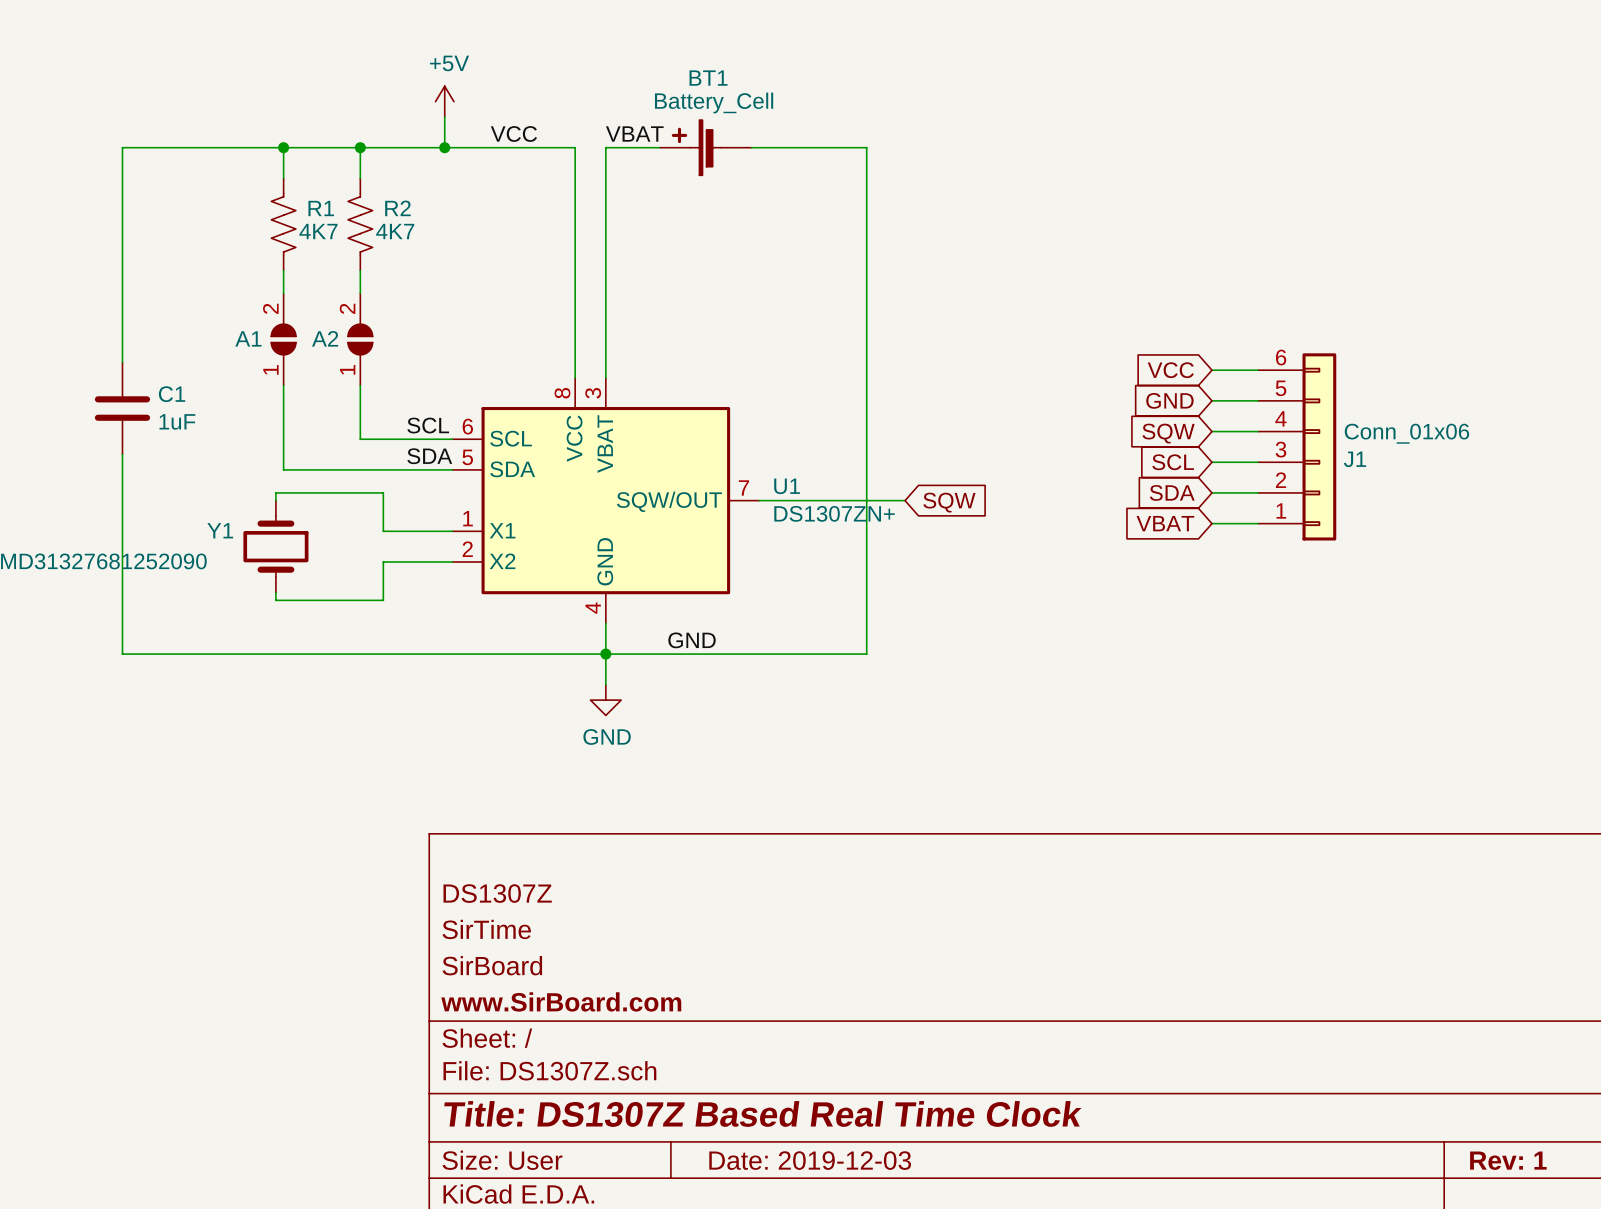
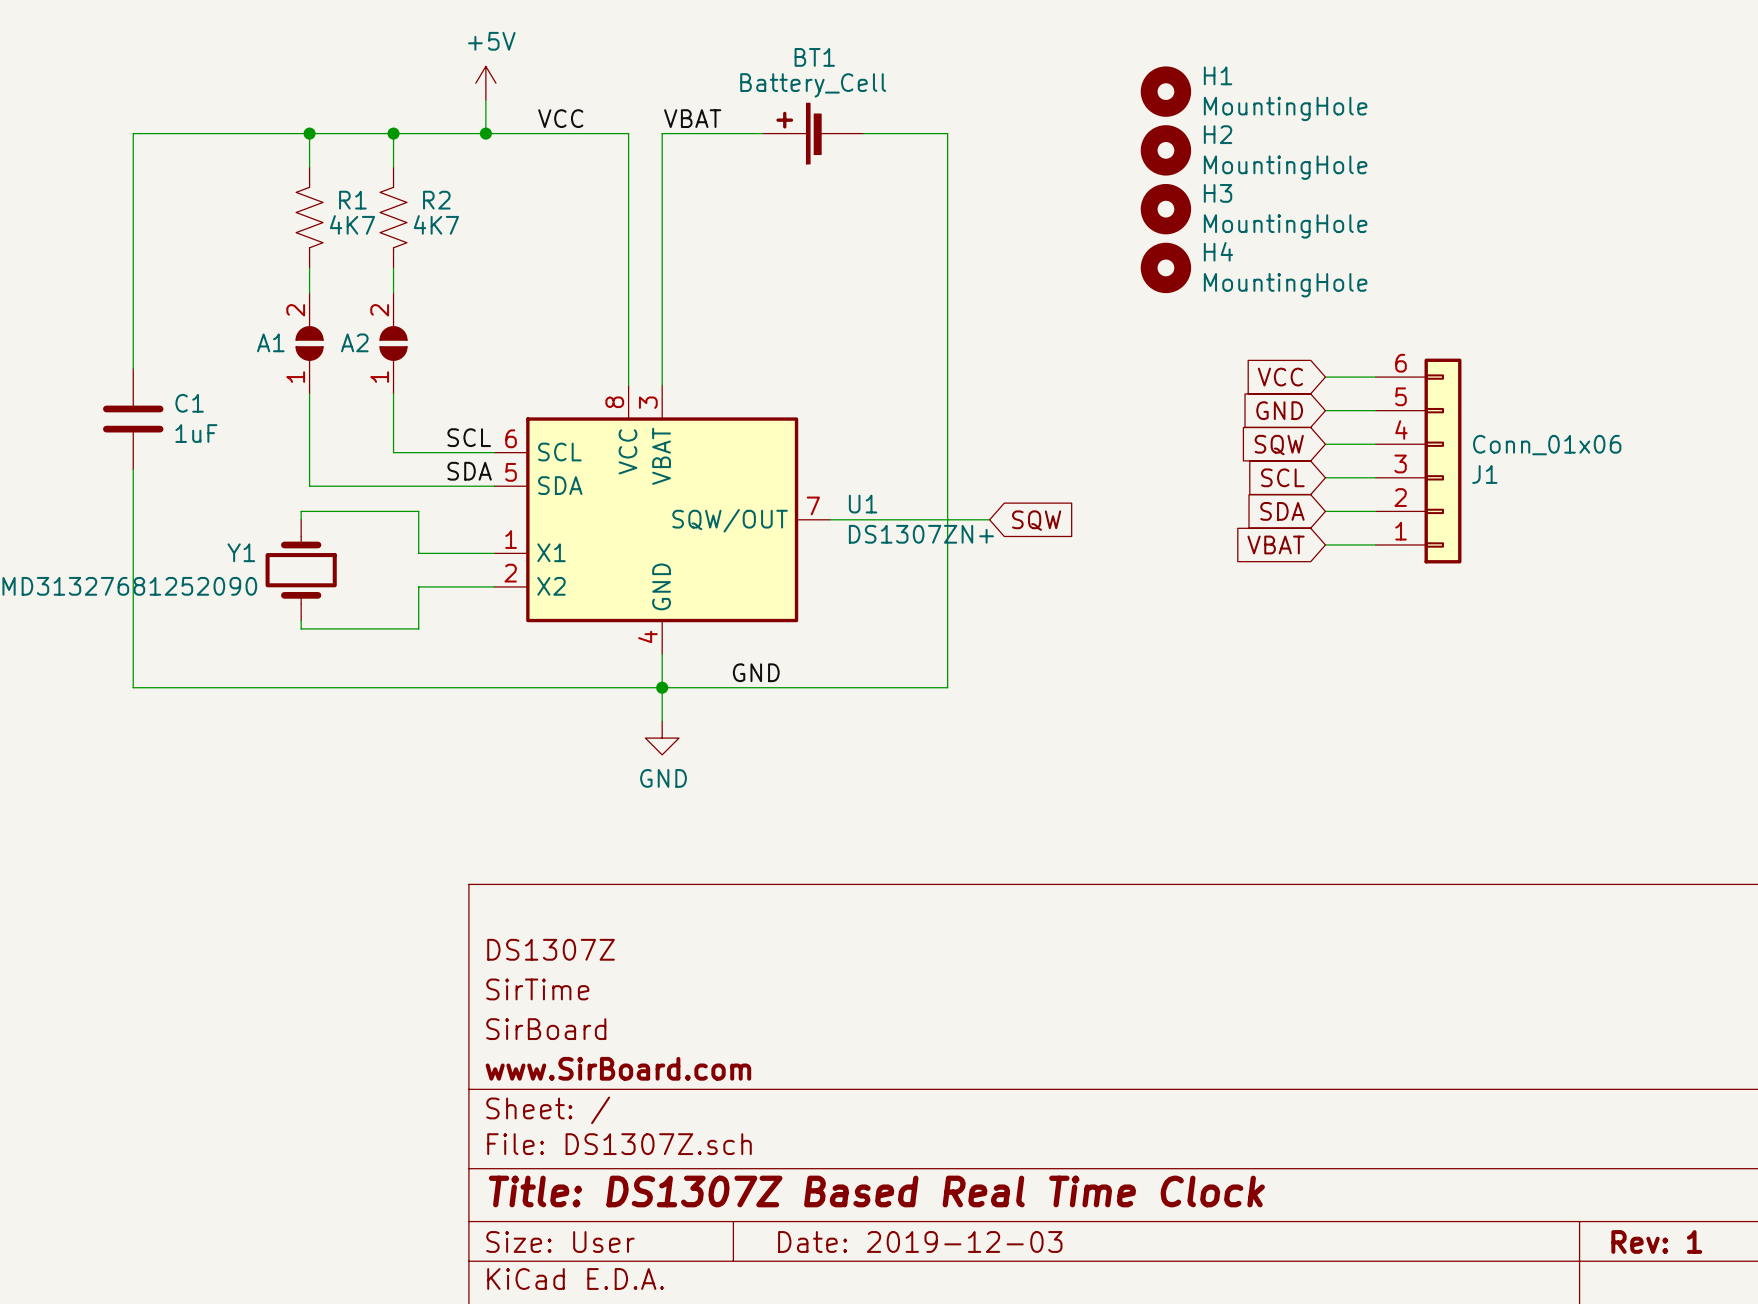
H1: none -> MountingHole (1165, 91)
BT1 position: (705, 147) -> (813, 133)
H2: none -> MountingHole (1165, 150)
H3: none -> MountingHole (1165, 209)
H4: none -> MountingHole (1165, 267)

